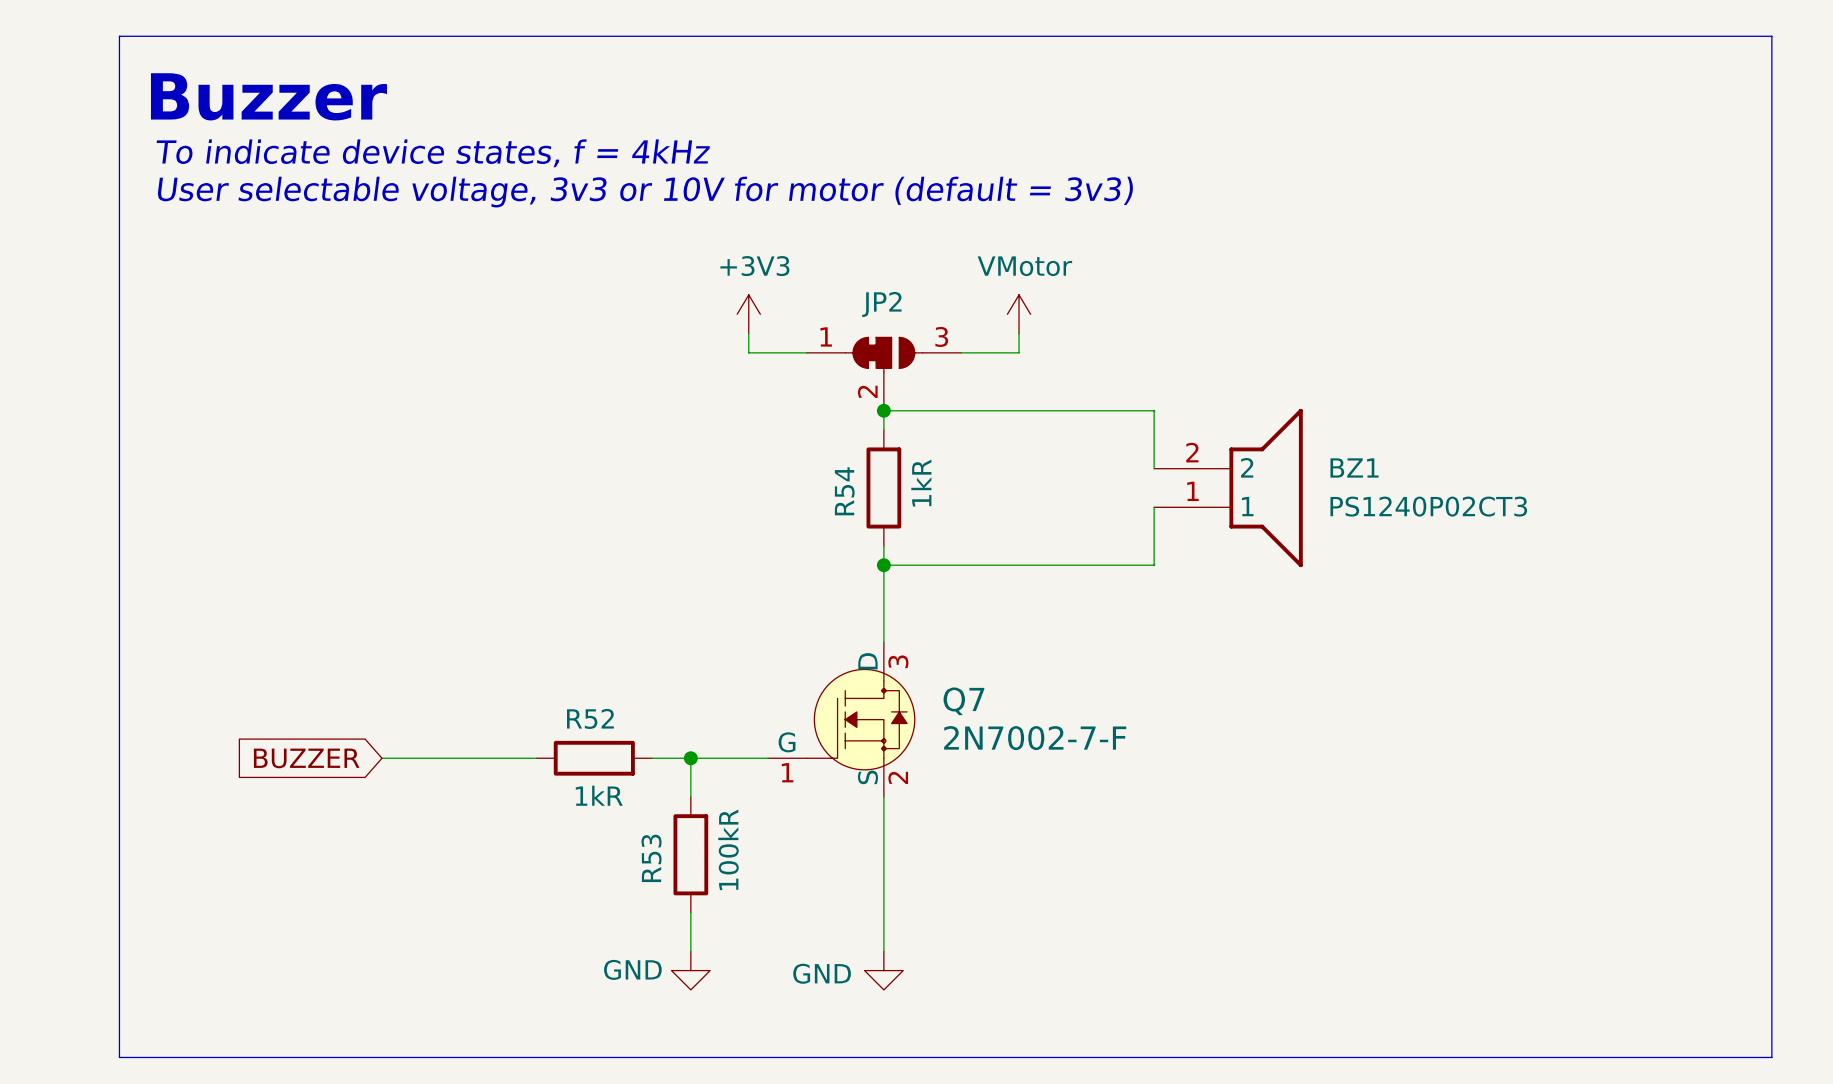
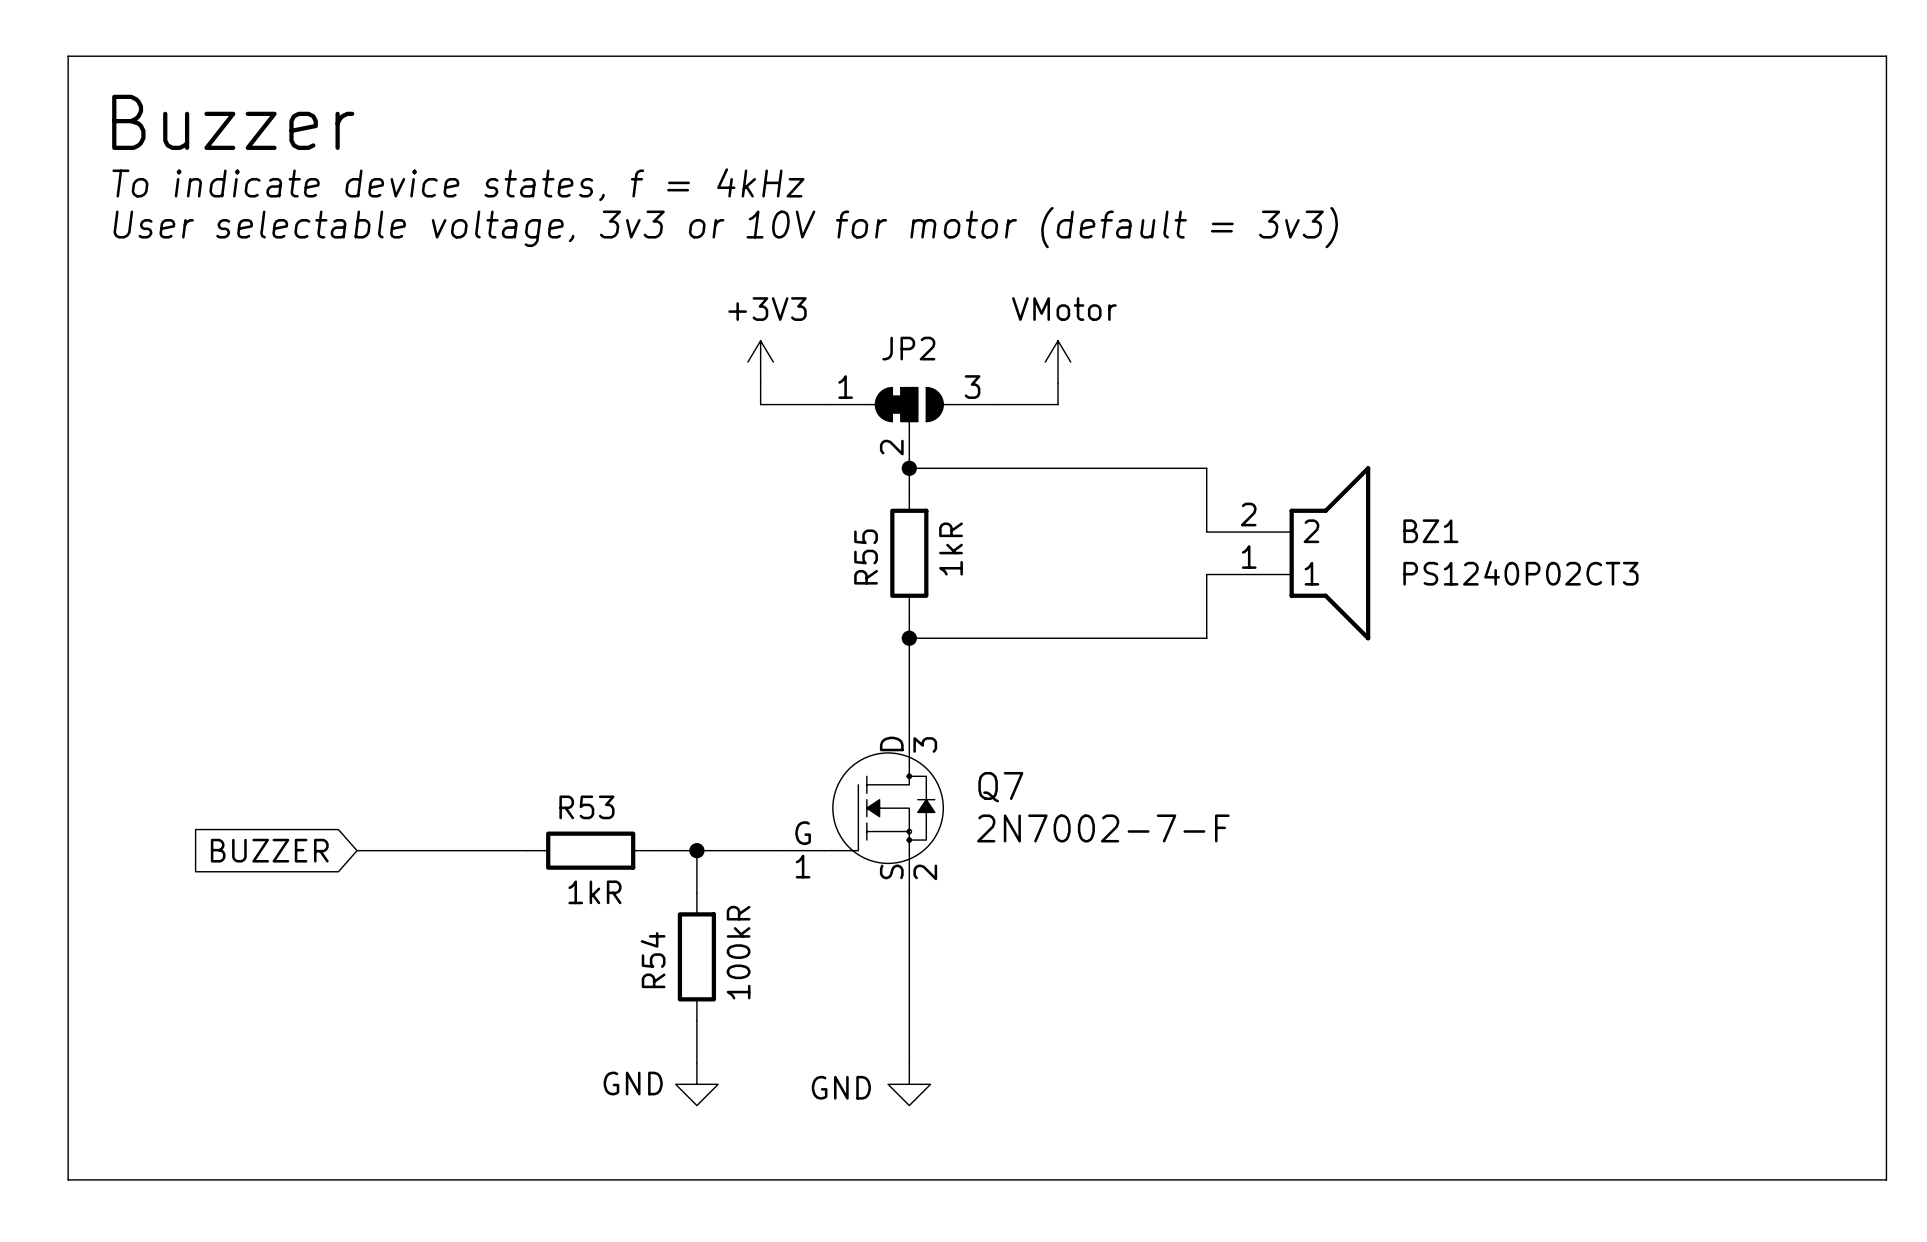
R54 name: R54 (844, 491) -> R55 (866, 557)
R52 name: R52 (590, 718) -> R53 (586, 807)
R53 name: R53 (651, 858) -> R54 (653, 960)

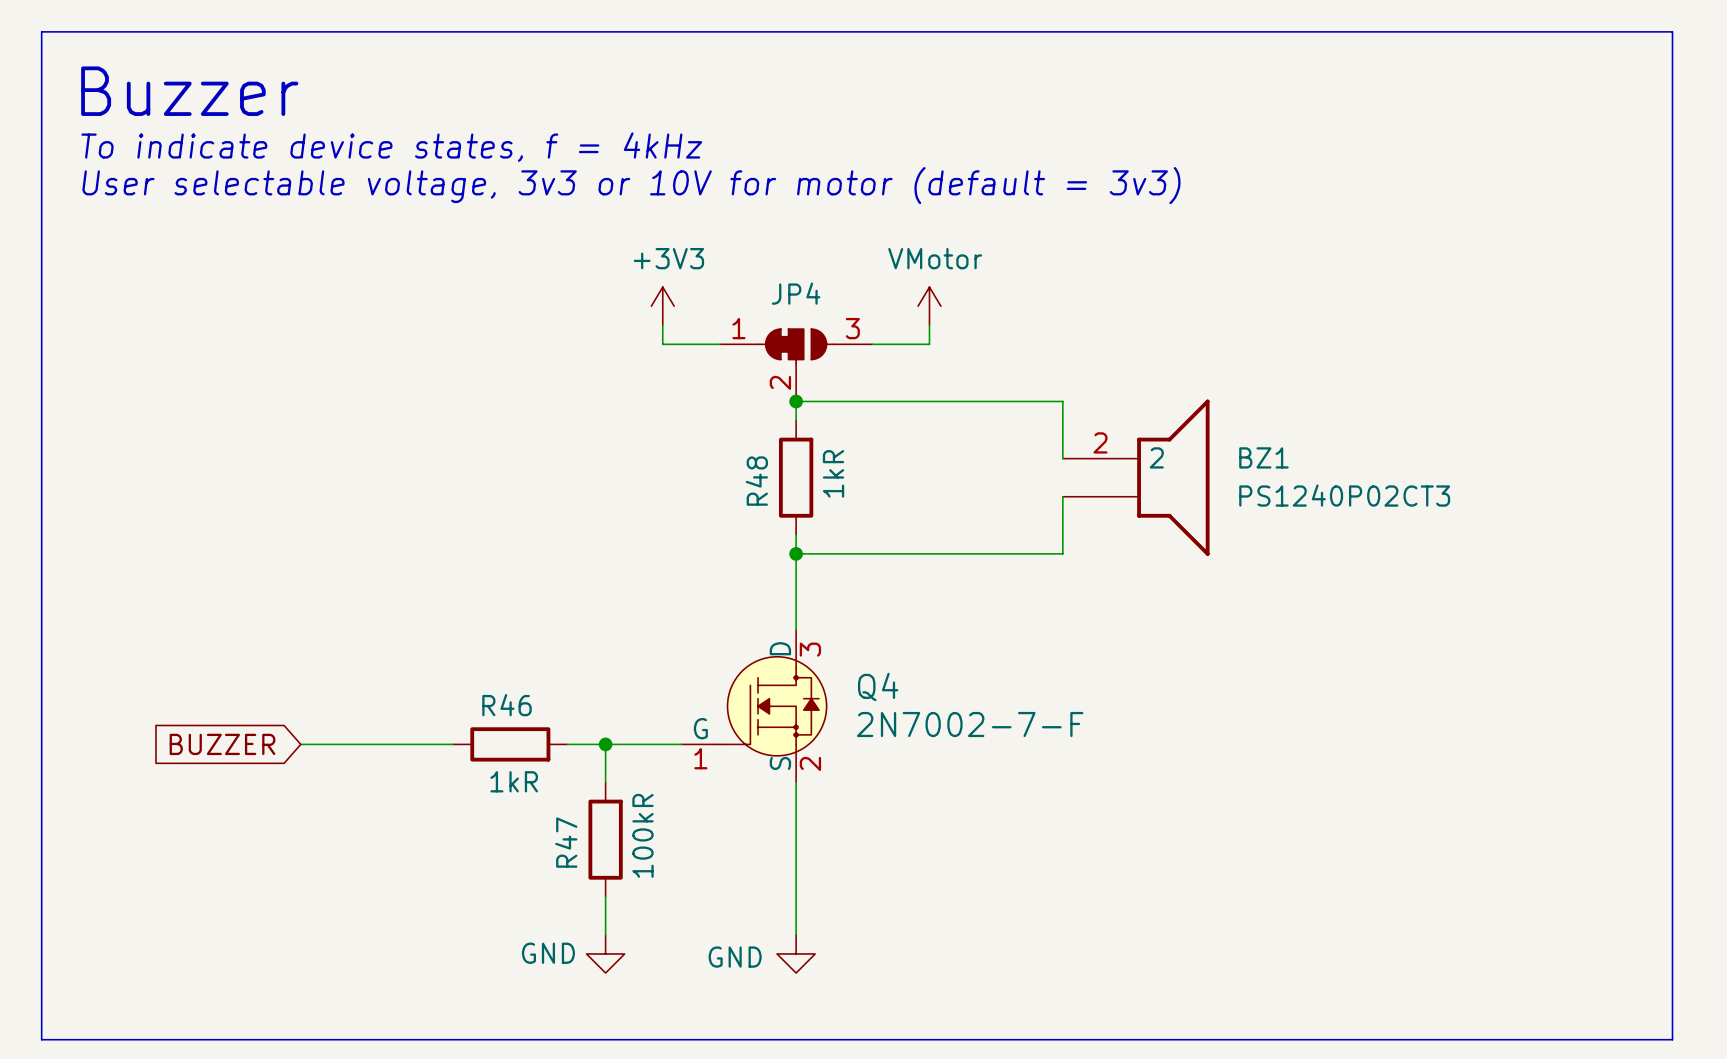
JP2 name: JP2 (908, 348) -> JP4 (796, 293)
BZ1 pin number: 1 (1249, 556) -> none
R55 name: R55 (866, 557) -> R48 (756, 481)
BZ1 pin name: 1 (1311, 573) -> none
Q7 name: Q7 (1000, 787) -> Q4 (878, 686)
R53 name: R53 (586, 807) -> R46 (506, 705)
R54 name: R54 (653, 960) -> R47 (566, 842)

